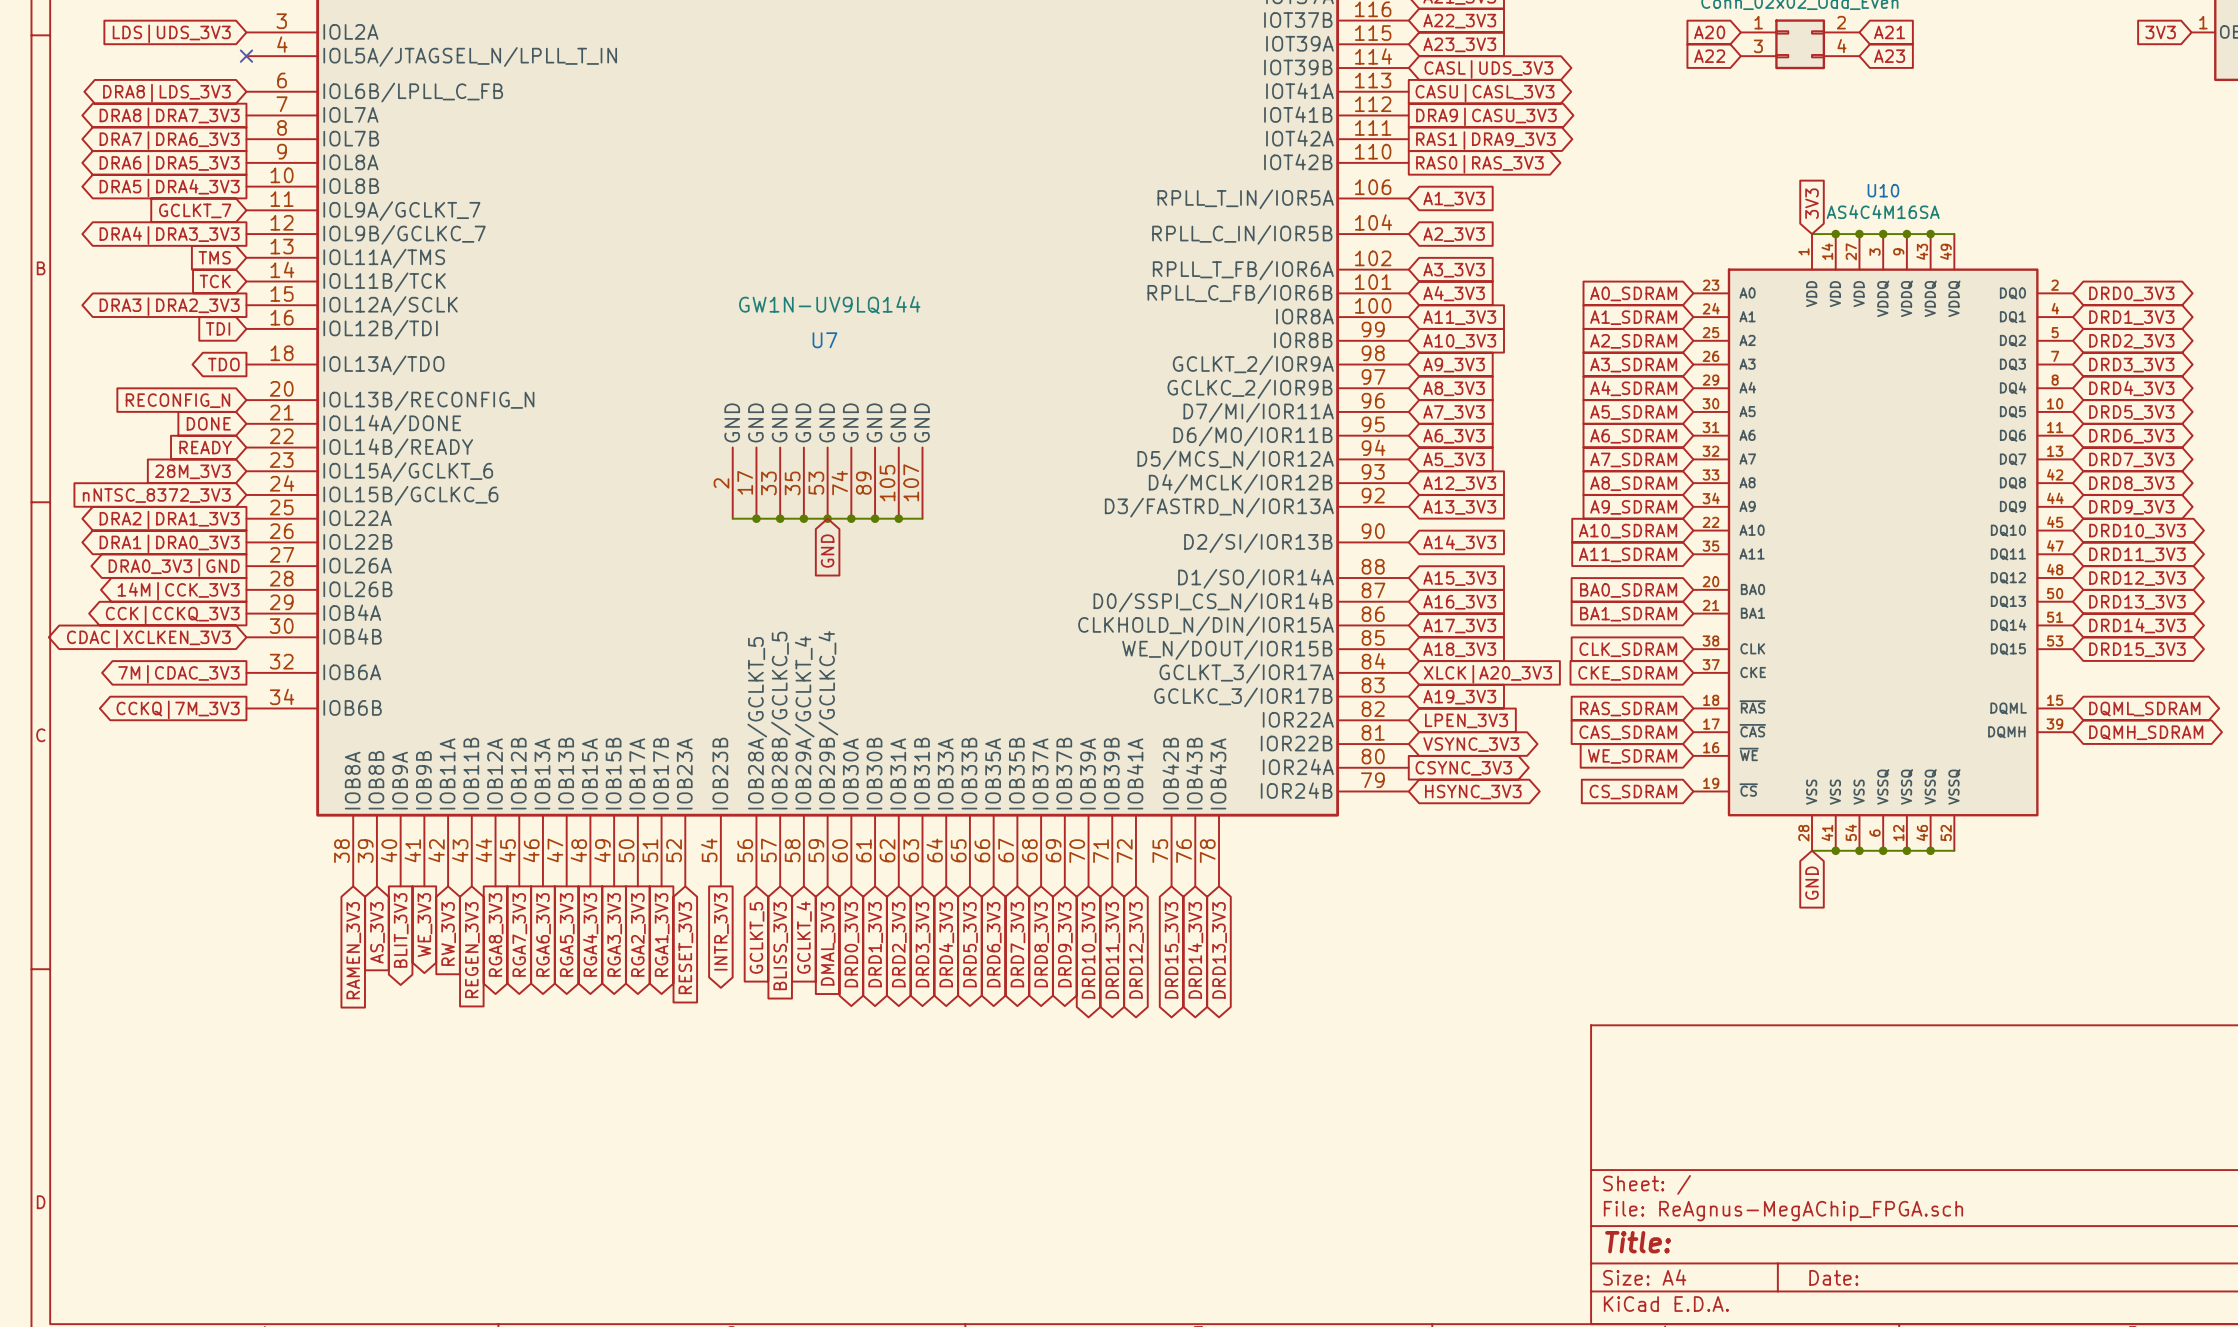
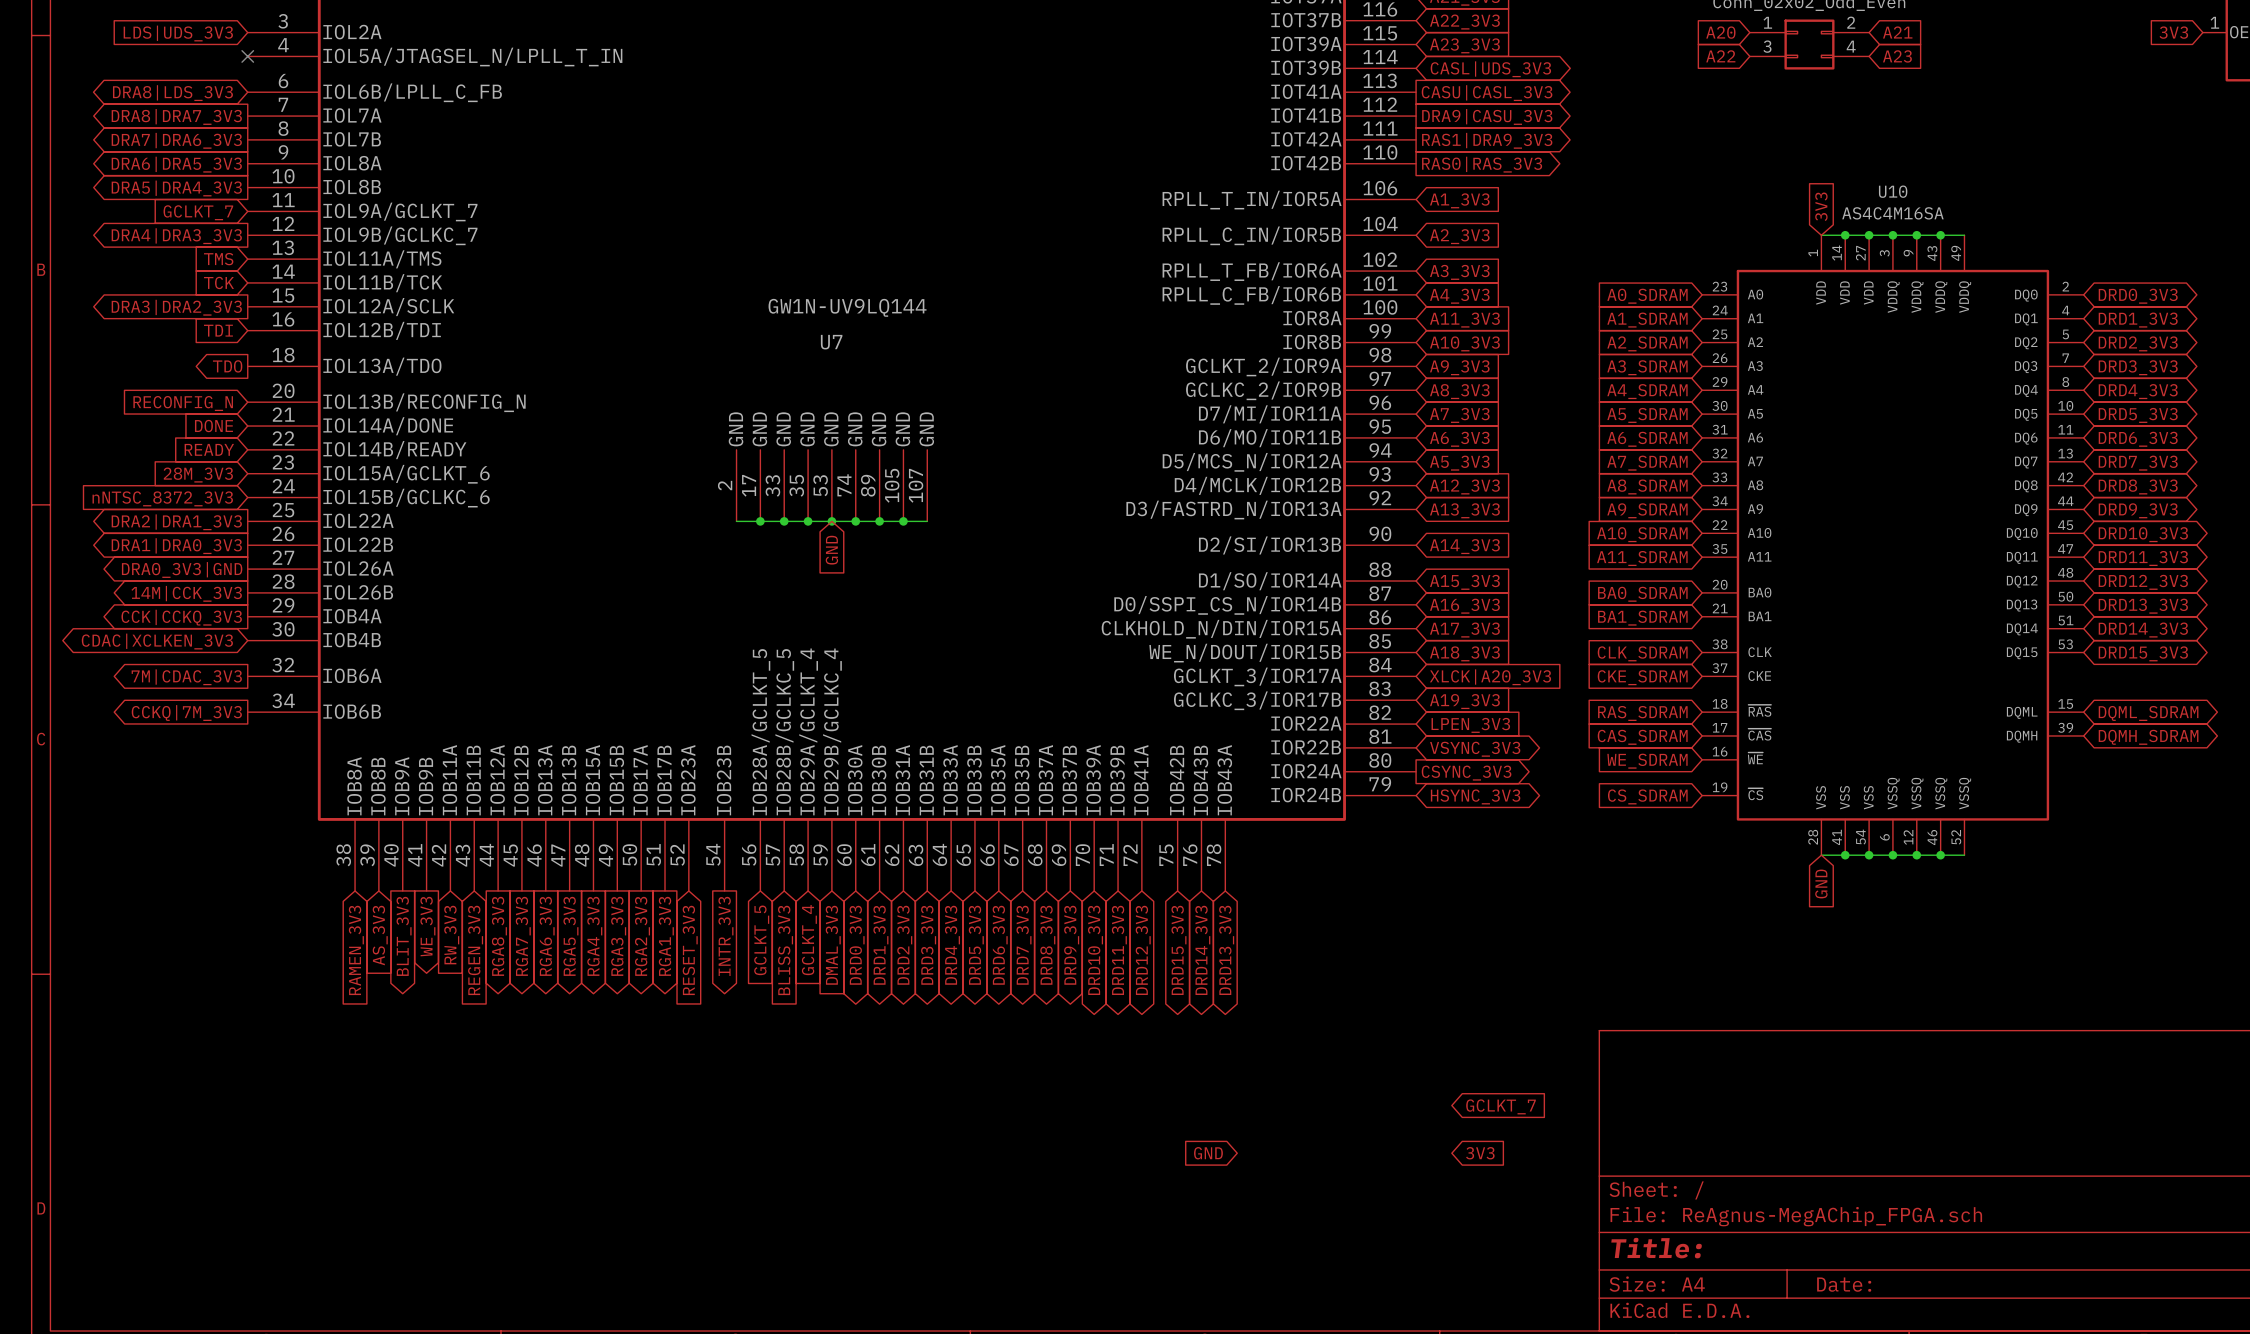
global label: none -> GCLKT_7 (1501, 1106)
global label: none -> GND (1208, 1153)
global label: none -> 3V3 (1480, 1153)

